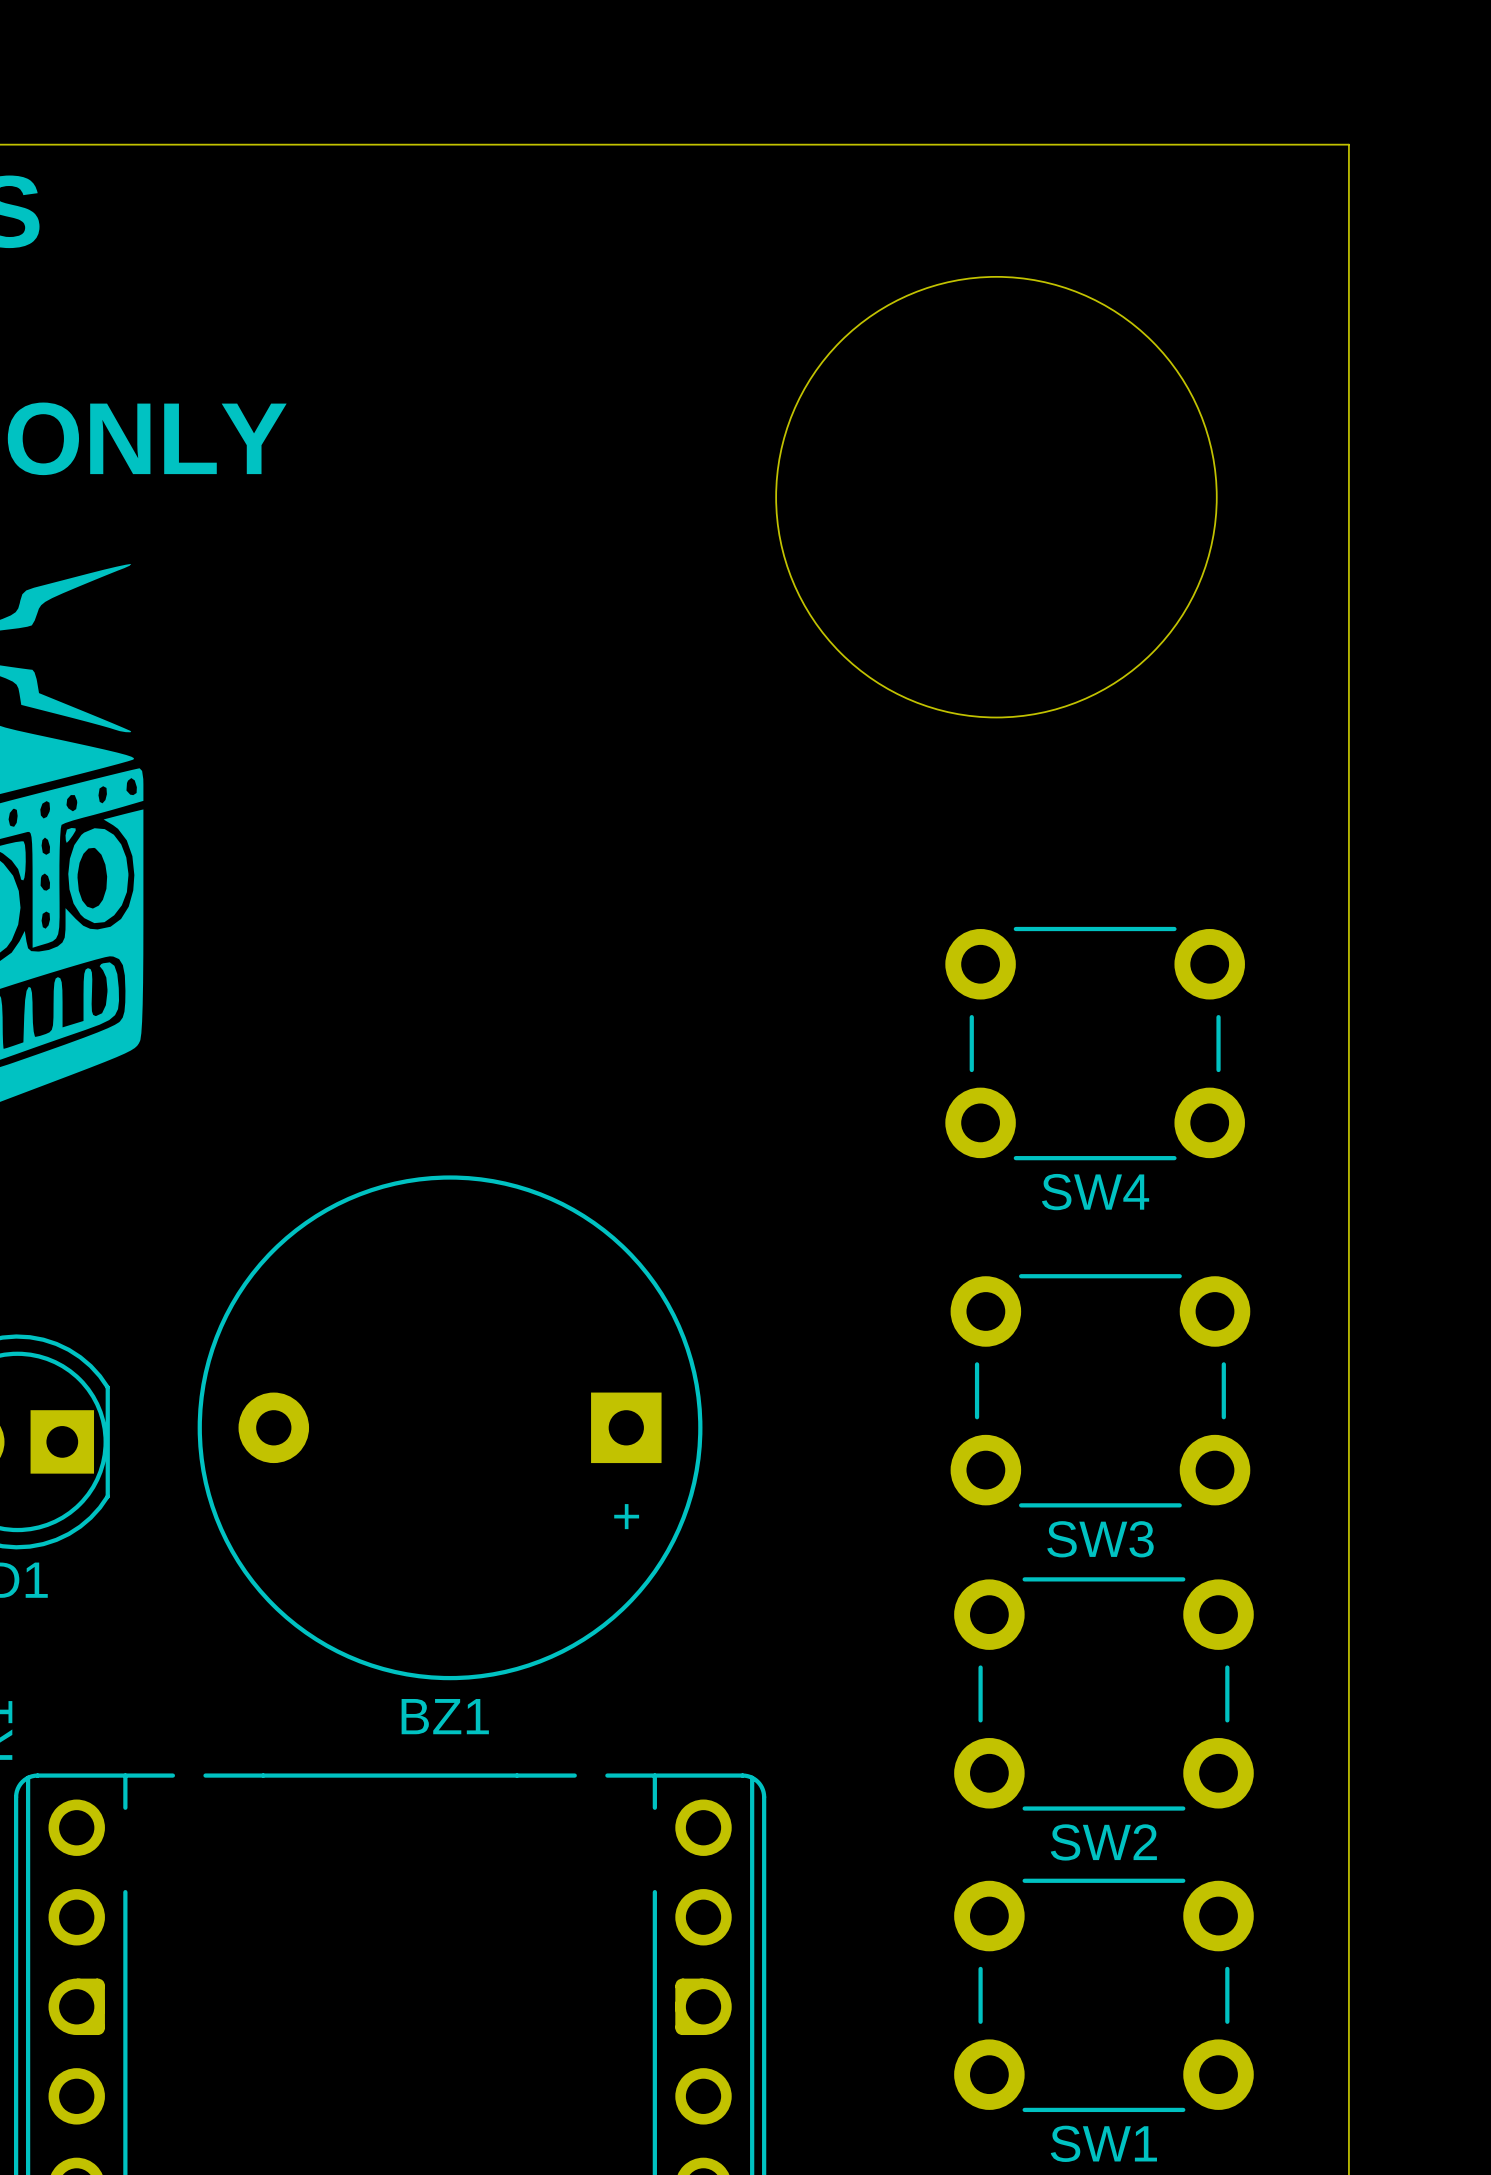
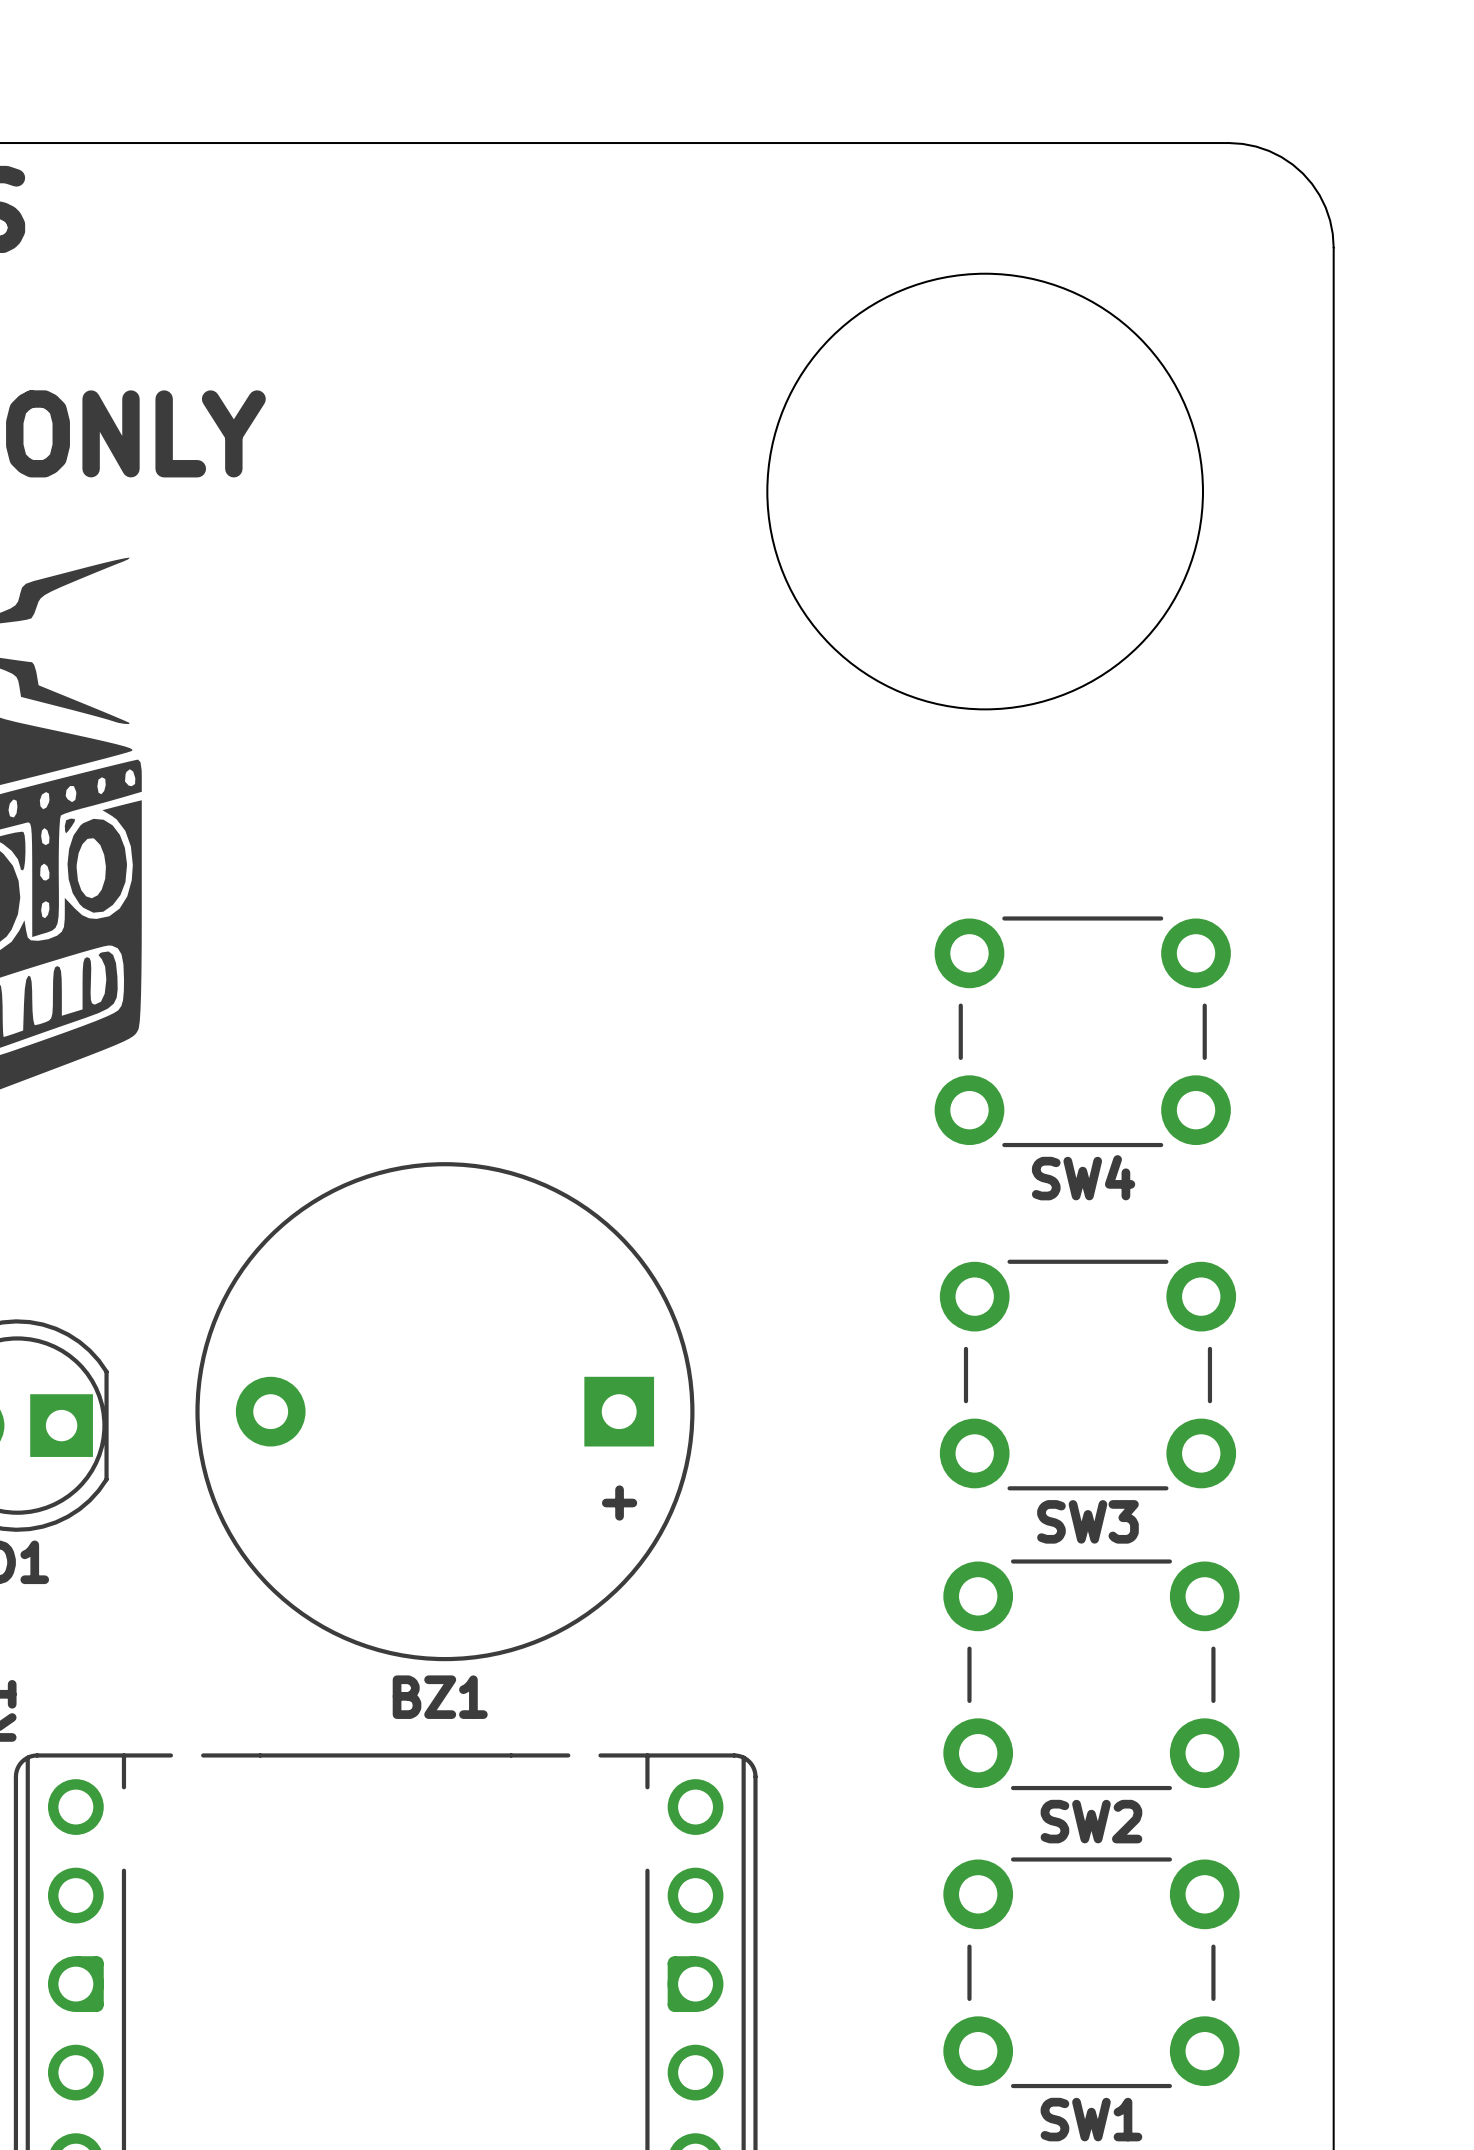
board edge: (1243, 144) (1348, 144) (1348, 250) -> (1229, 143) (1242, 143) (1269, 150) (1292, 164) (1303, 173) (1319, 195) (1325, 207) (1332, 233) (1333, 247)

